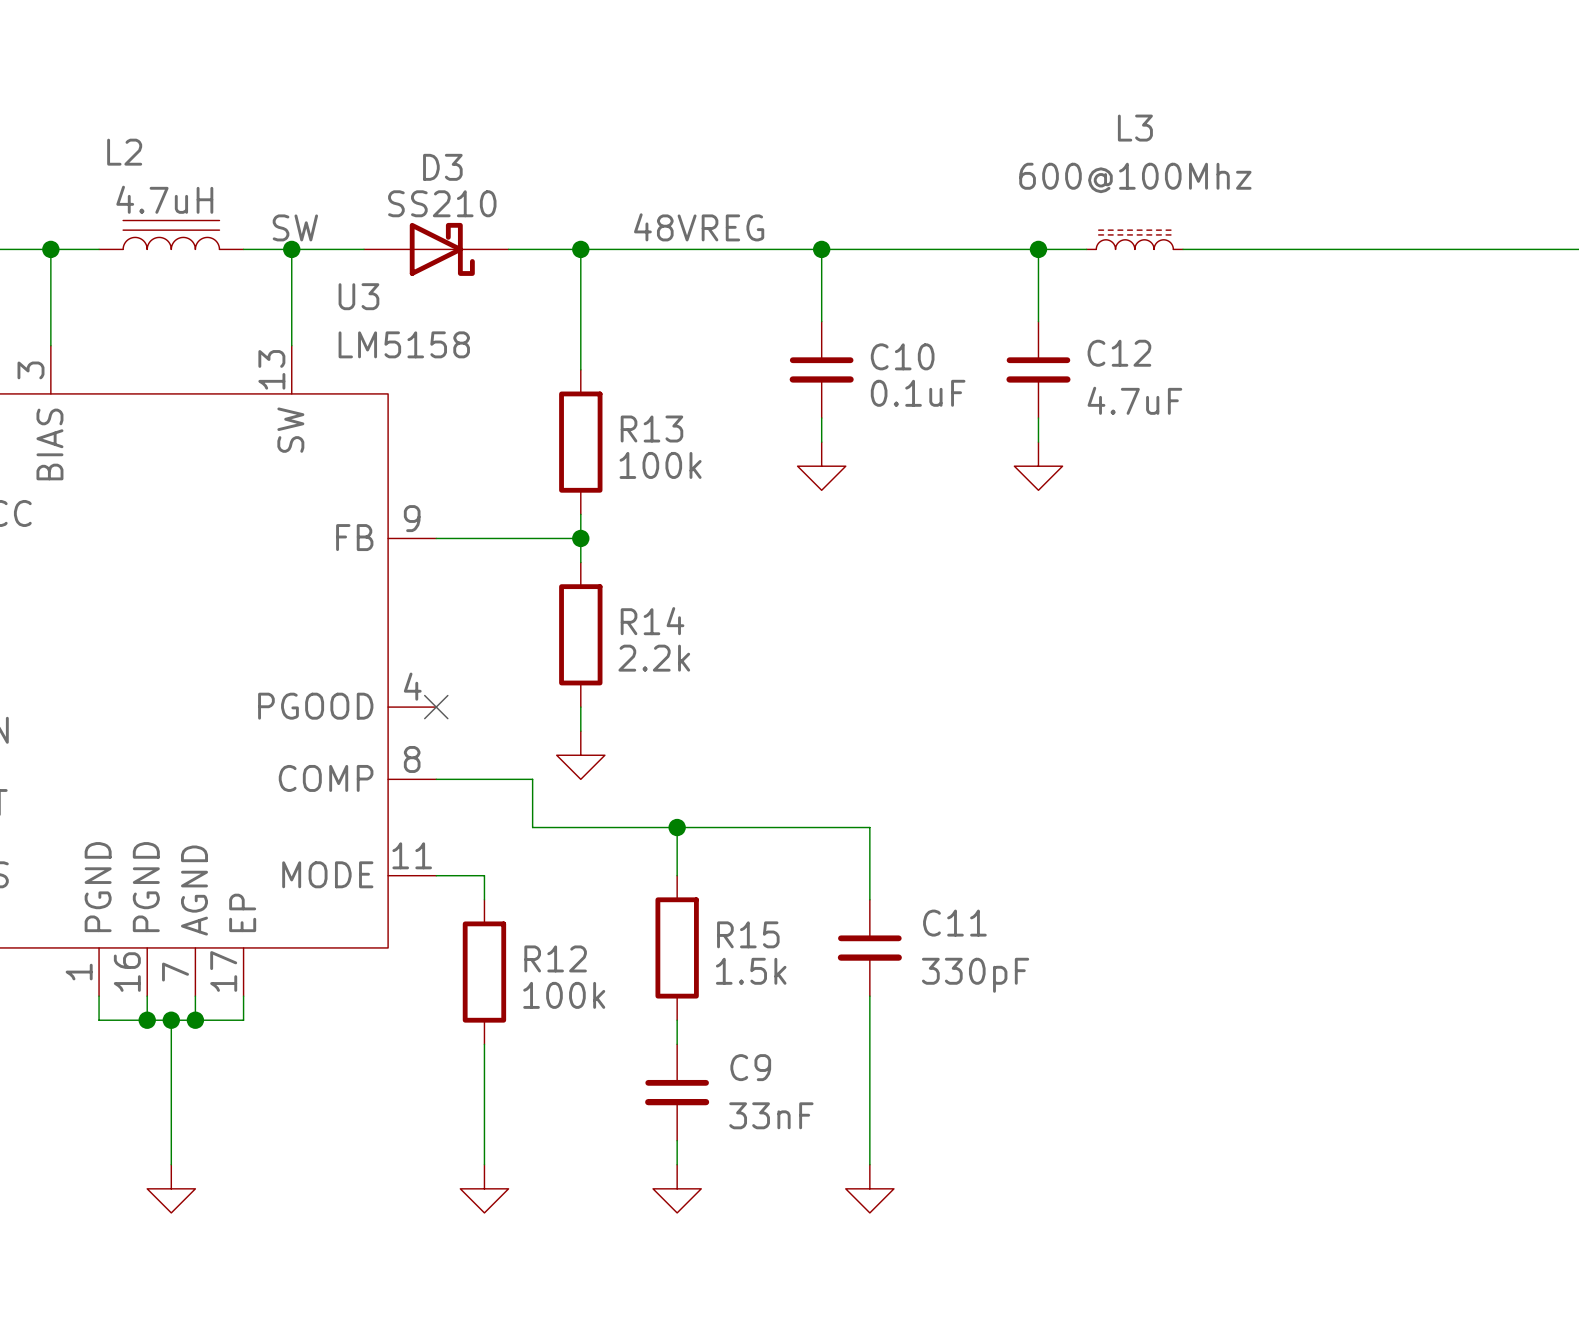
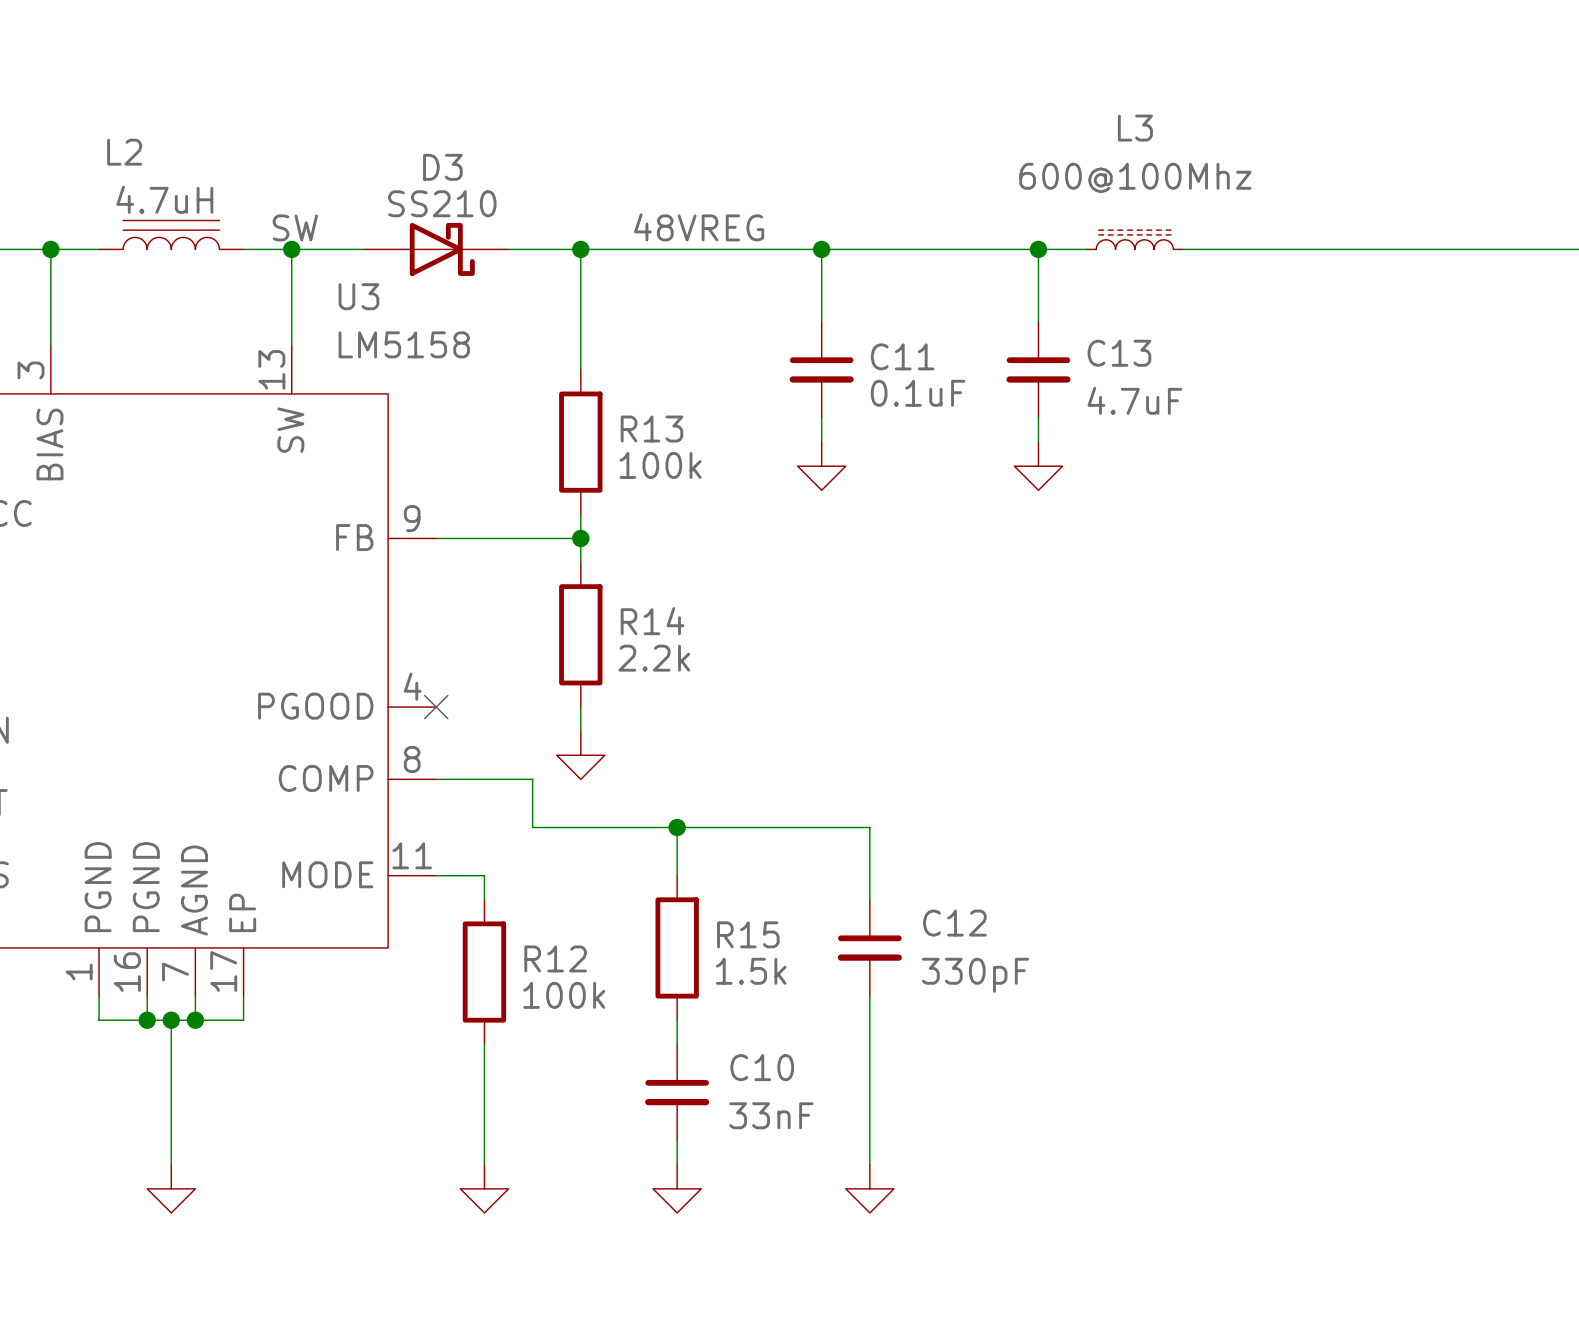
C12 name: C12 (1119, 353) -> C13 (1119, 353)
C10 name: C10 (902, 356) -> C11 (902, 356)
C11 name: C11 (954, 923) -> C12 (954, 923)
C9 name: C9 (750, 1067) -> C10 (762, 1067)

